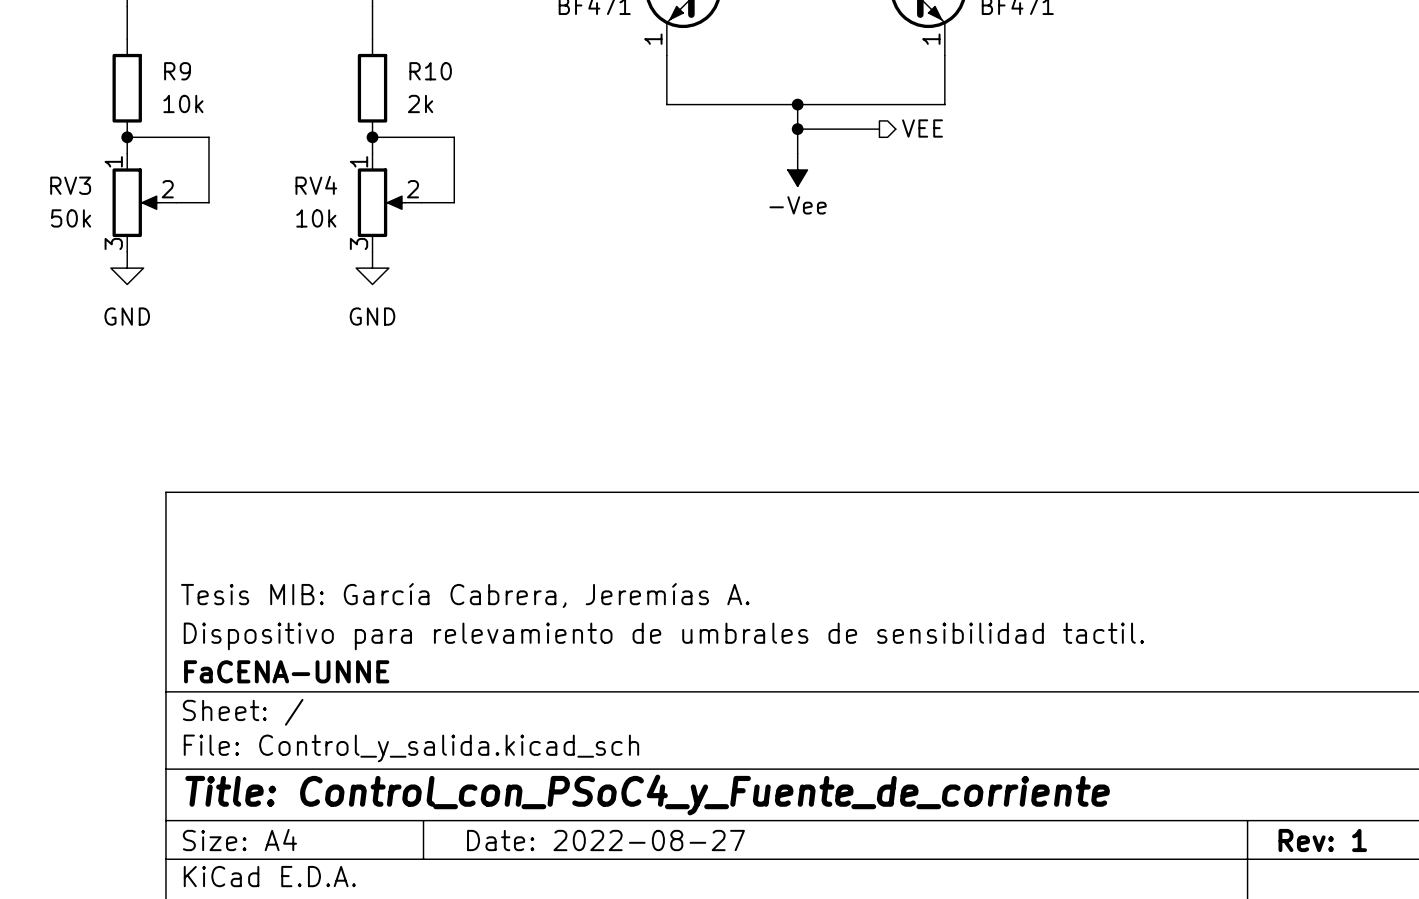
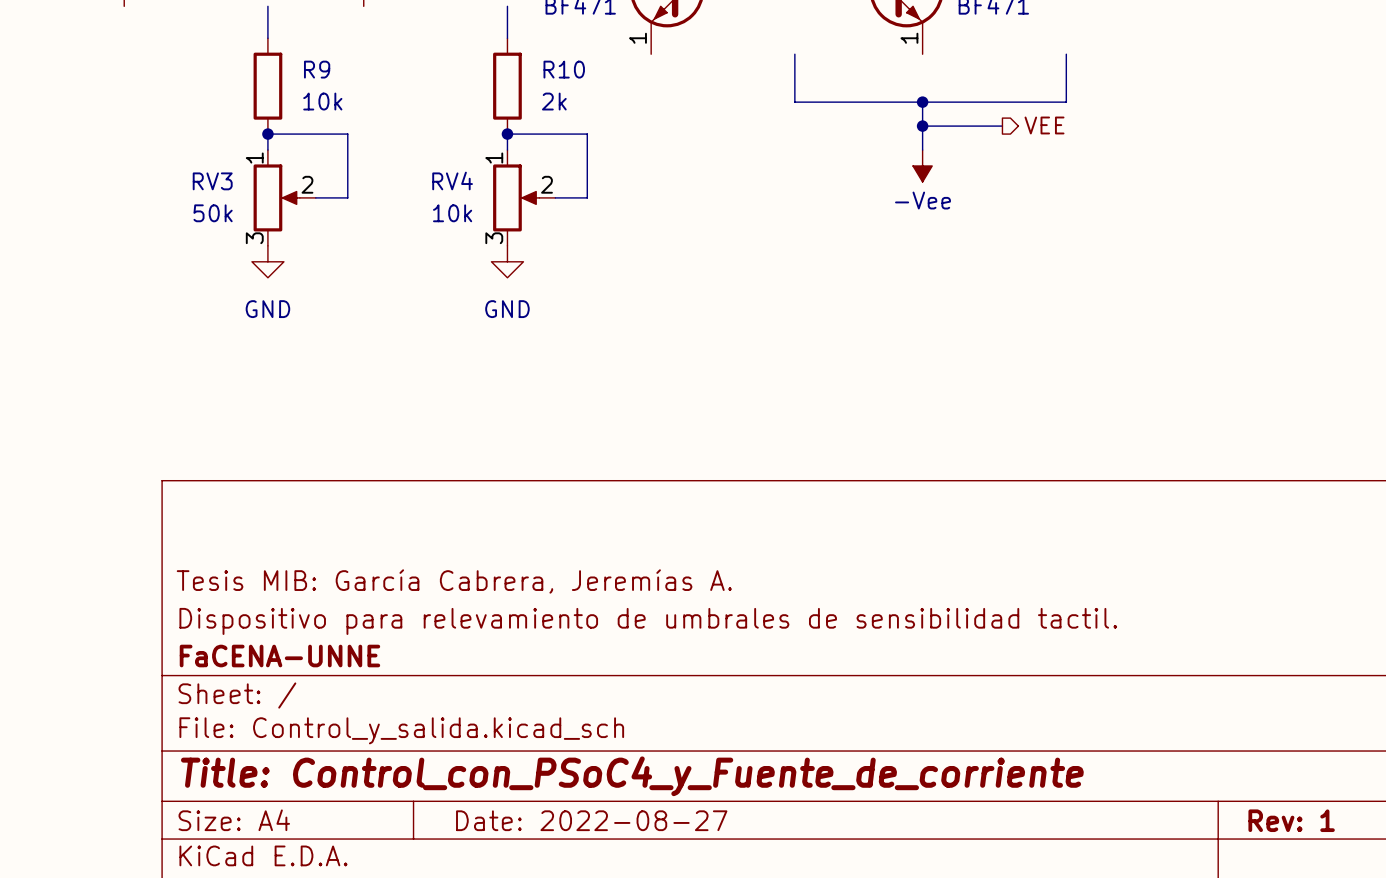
wire: (127, 6) (127, 39) -> (267, 6) (267, 38)
wire: (372, 6) (372, 39) -> (507, 6) (507, 38)
wire: (666, 55) (666, 104) (814, 104) -> (794, 54) (794, 102)
wire: (944, 55) (944, 104) -> none
wire: none -> (1066, 54) (1066, 102) (922, 102) (922, 150)
R9 position: (127, 88) -> (267, 86)
R10 position: (372, 88) -> (507, 86)
wire: (797, 104) (797, 153) -> none
junction: (797, 104) -> none
junction: none -> (922, 102)
hierarchical label position: VEE (922, 128) -> VEE (1044, 125)
wire: (797, 129) (879, 129) -> (922, 126) (1002, 126)
junction: (797, 129) -> none
junction: none -> (922, 126)
junction: (127, 137) -> none
junction: none -> (267, 134)
junction: (372, 137) -> none
junction: none -> (507, 134)
wire: (127, 153) (127, 137) (208, 137) (208, 202) (176, 202) -> (267, 150) (267, 134) (347, 134) (347, 197) (315, 197)
wire: (372, 153) (372, 137) (454, 137) (454, 202) (421, 202) -> (507, 150) (507, 134) (587, 134) (587, 197) (555, 197)
power symbol position: (797, 170) -> (922, 166)
RV3 position: (144, 202) -> (284, 197)
RV4 position: (389, 202) -> (524, 197)
power symbol: GND (127, 268) -> none
power symbol: none -> GND (267, 261)
power symbol: GND (372, 268) -> none
power symbol: none -> GND (507, 261)

